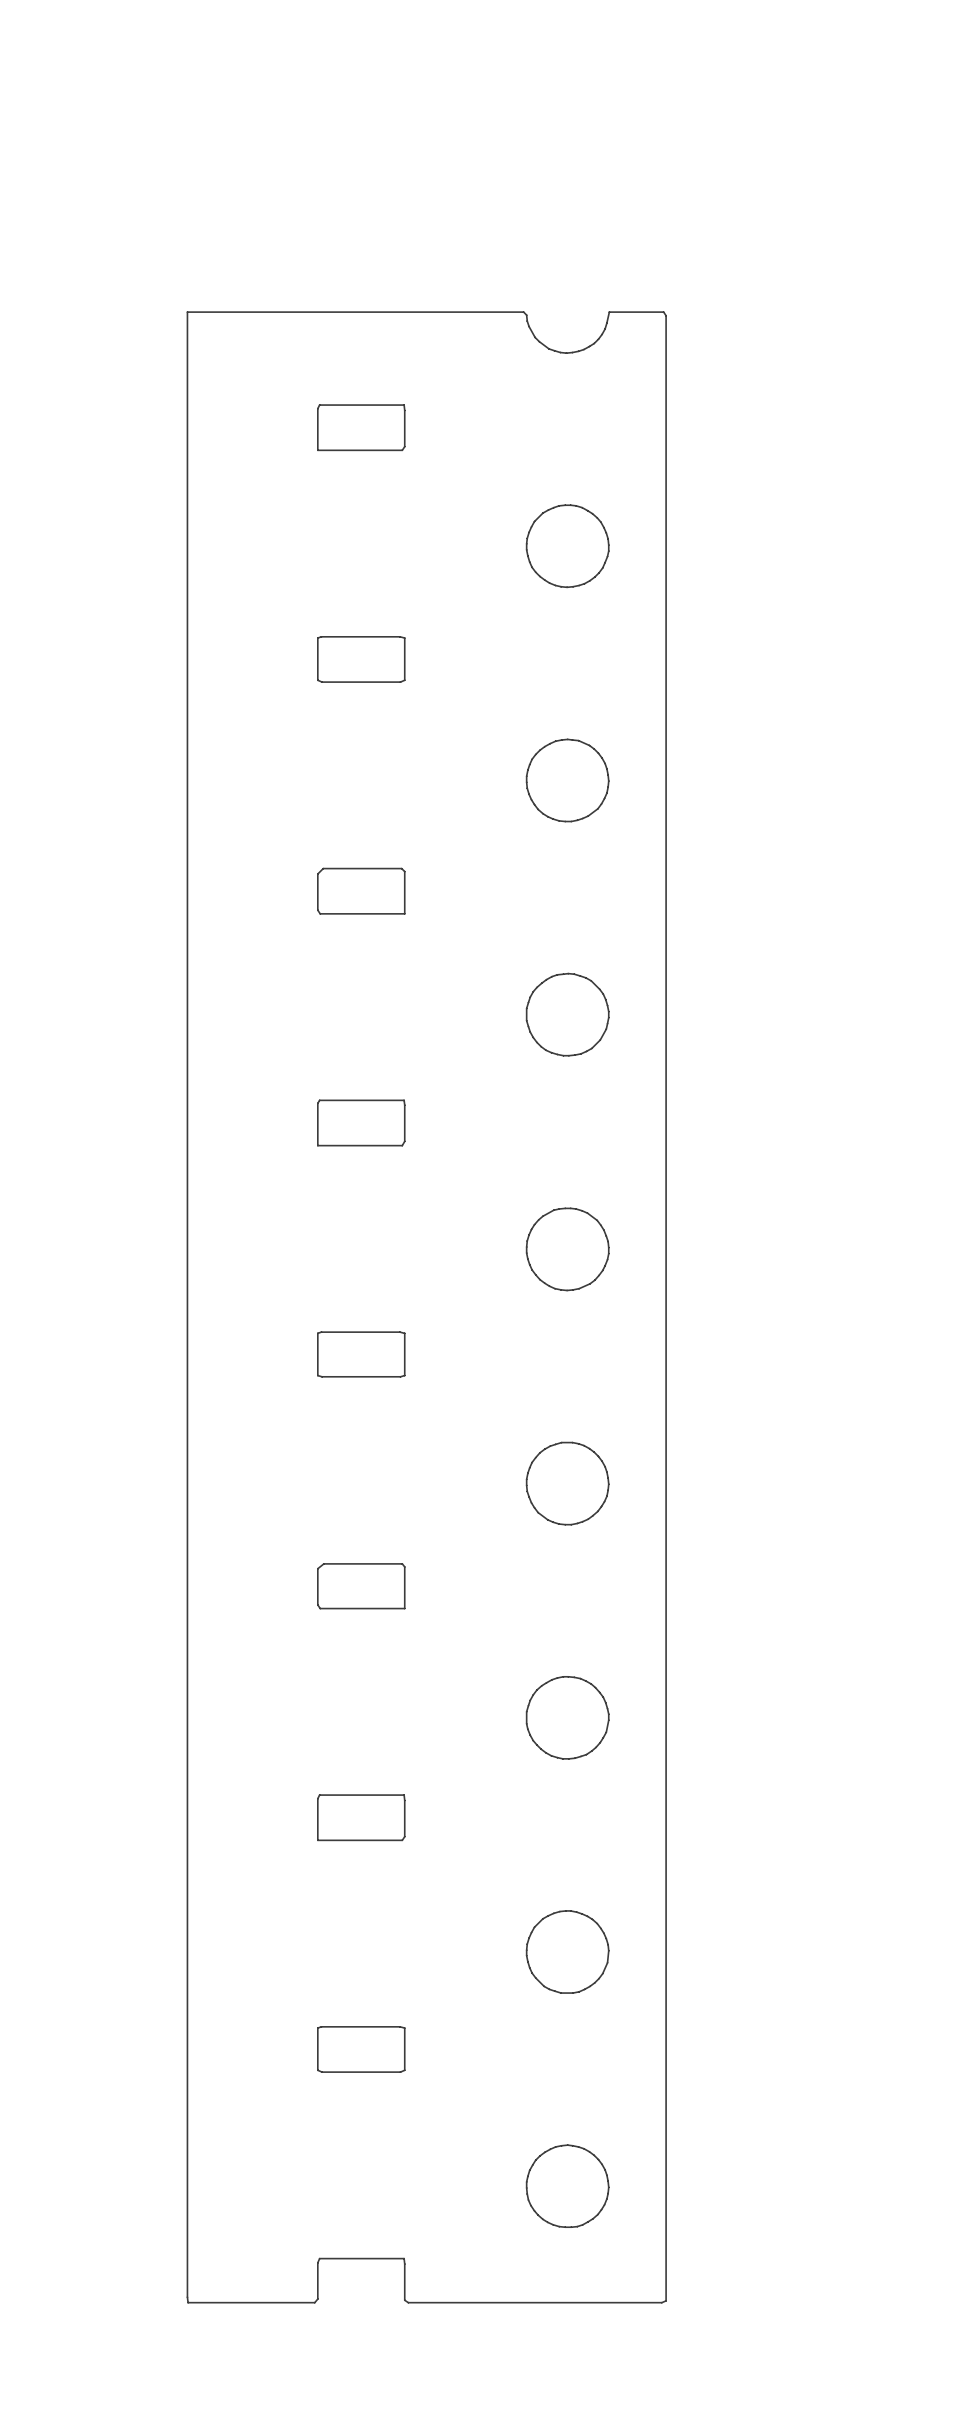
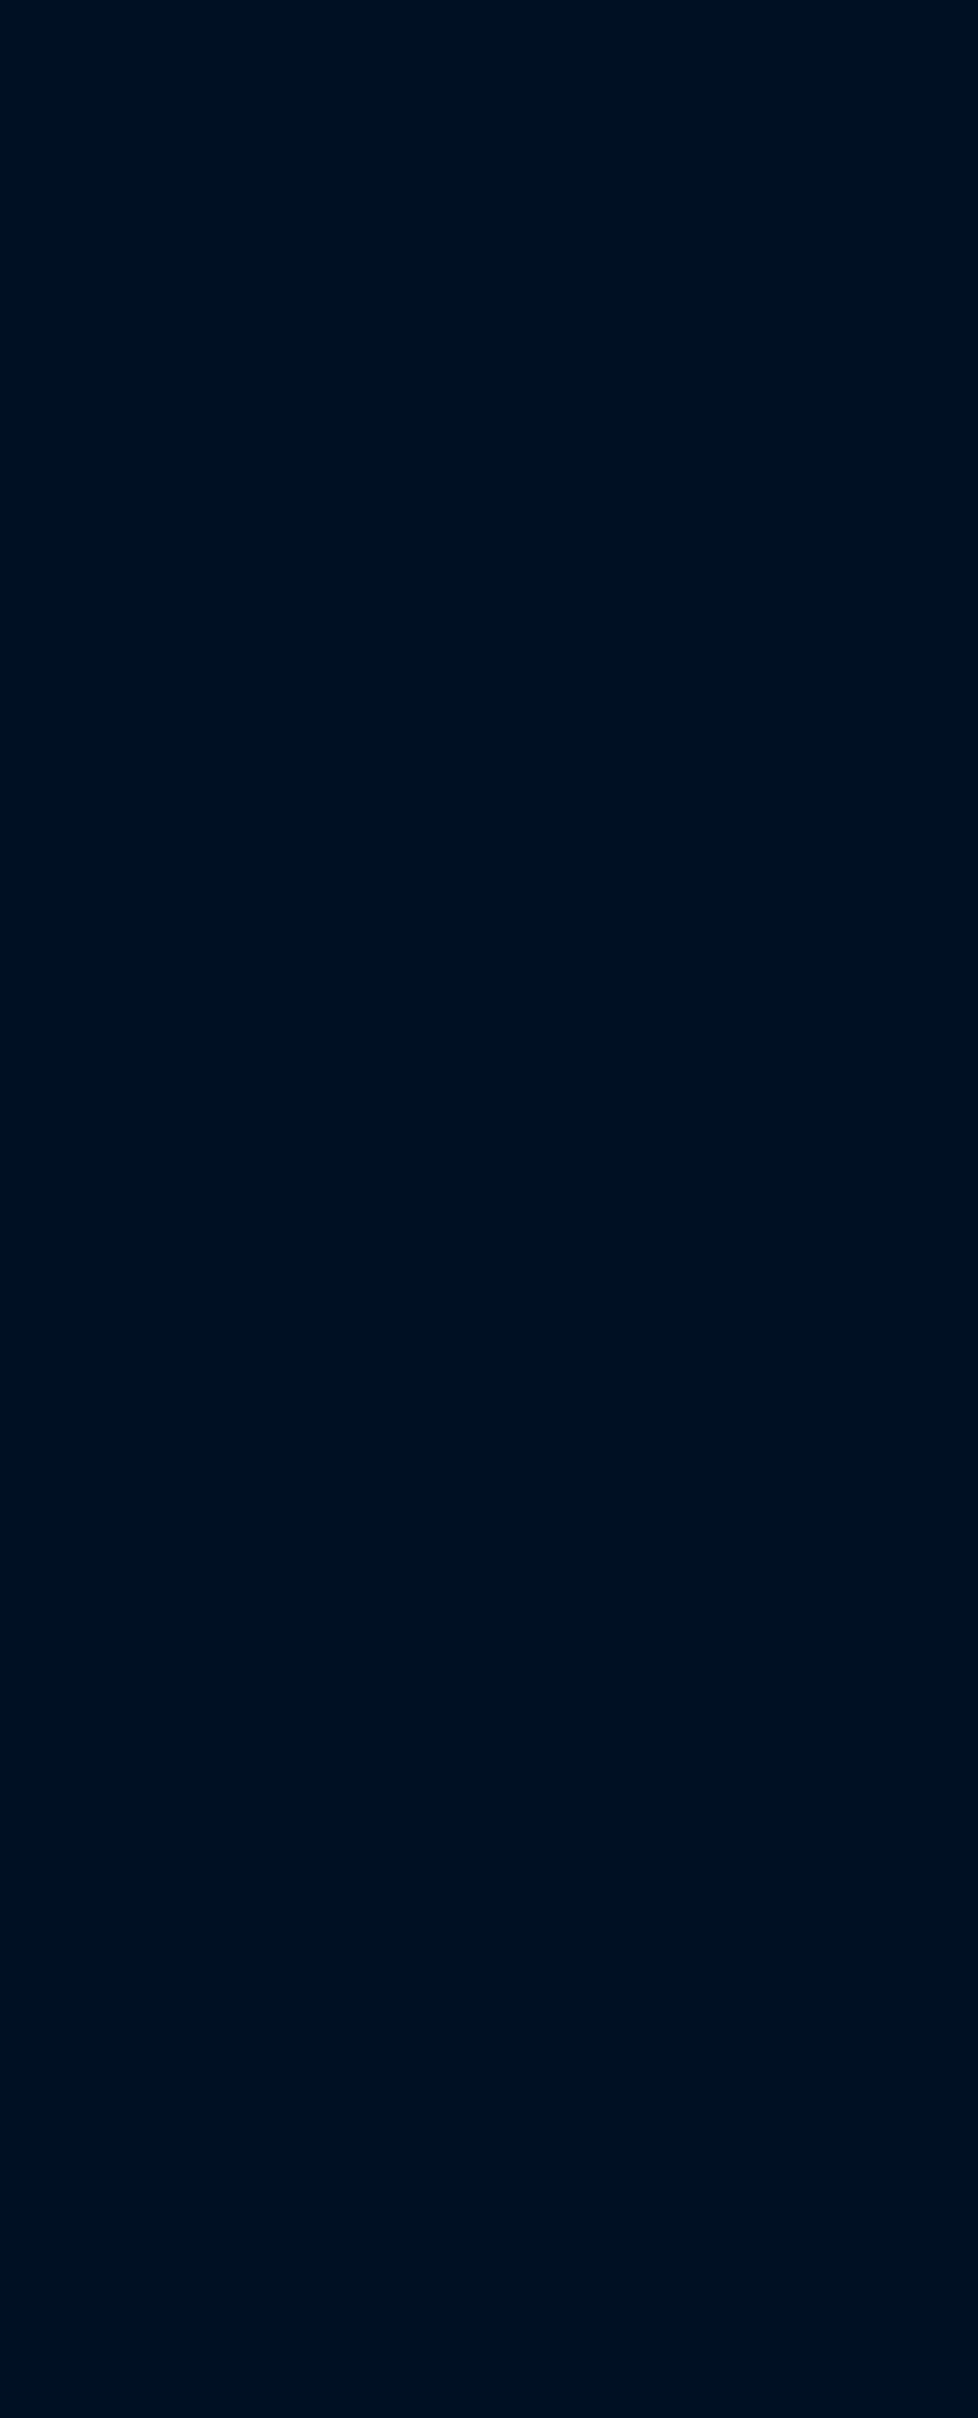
drawing: [187, 311, 667, 2303] -> none

